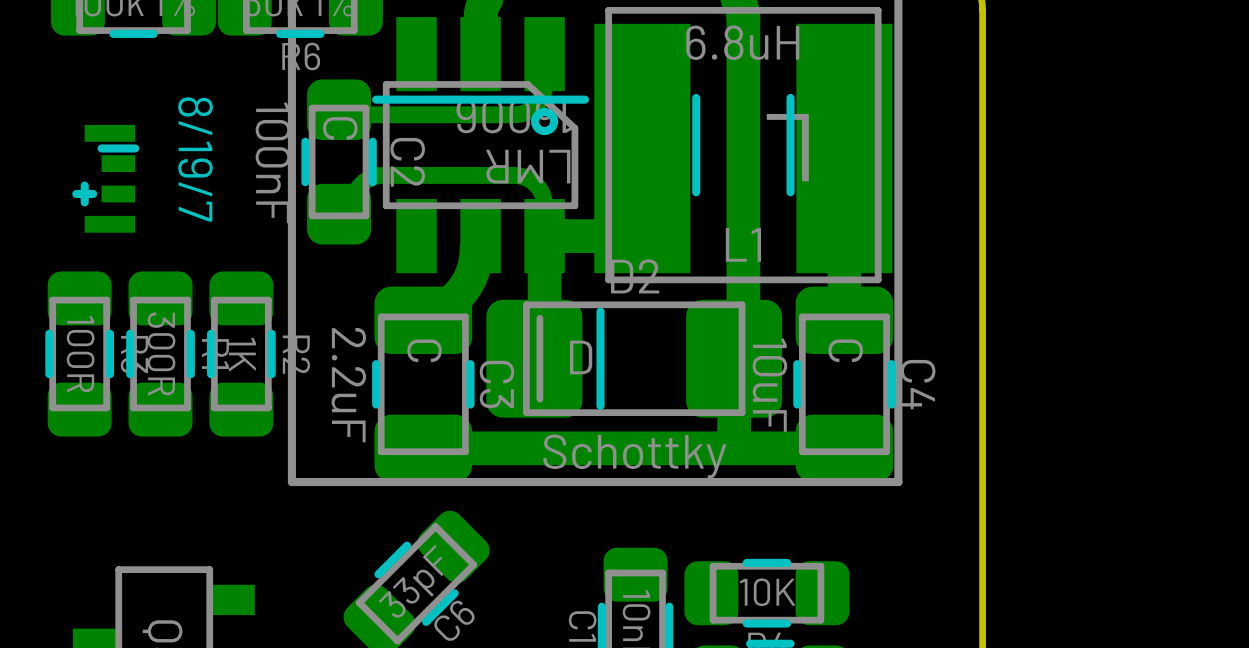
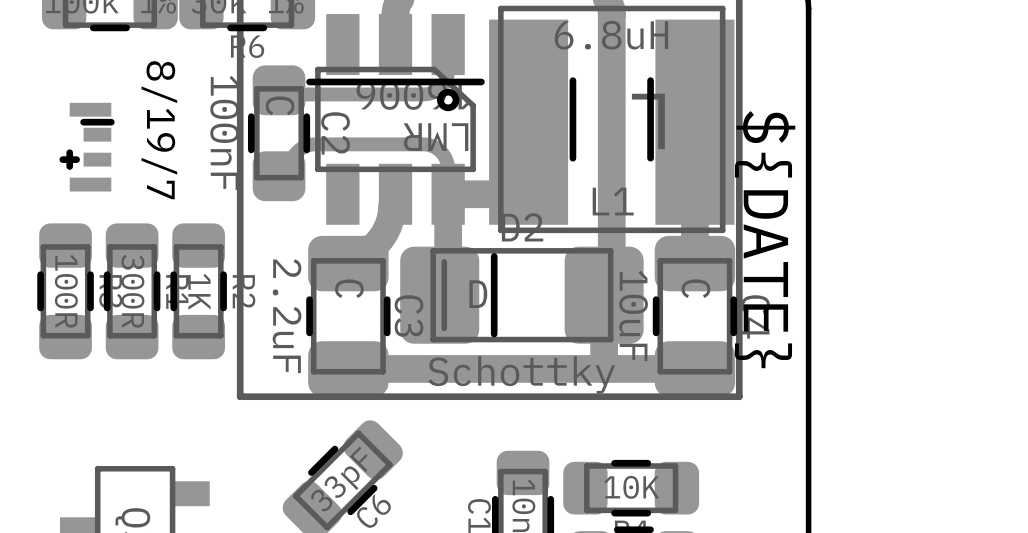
text: none -> ${DATE} (765, 239)

